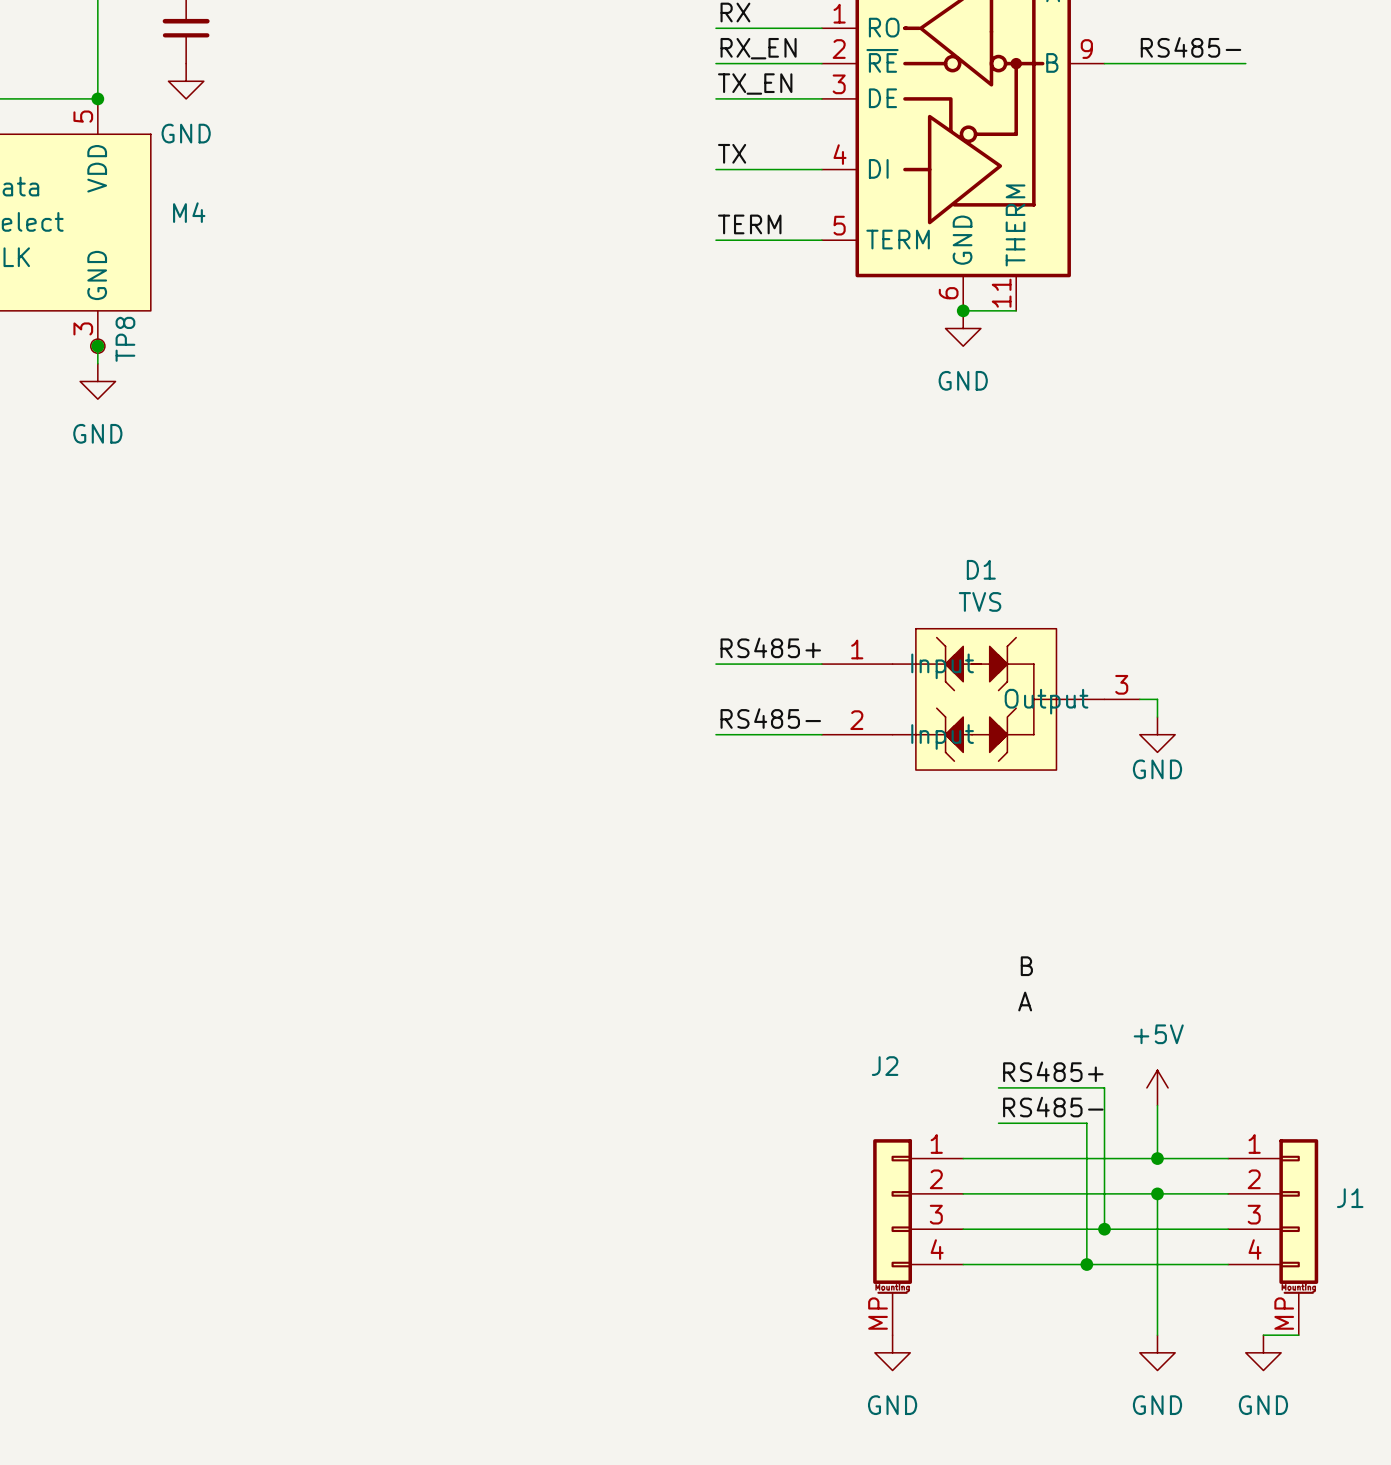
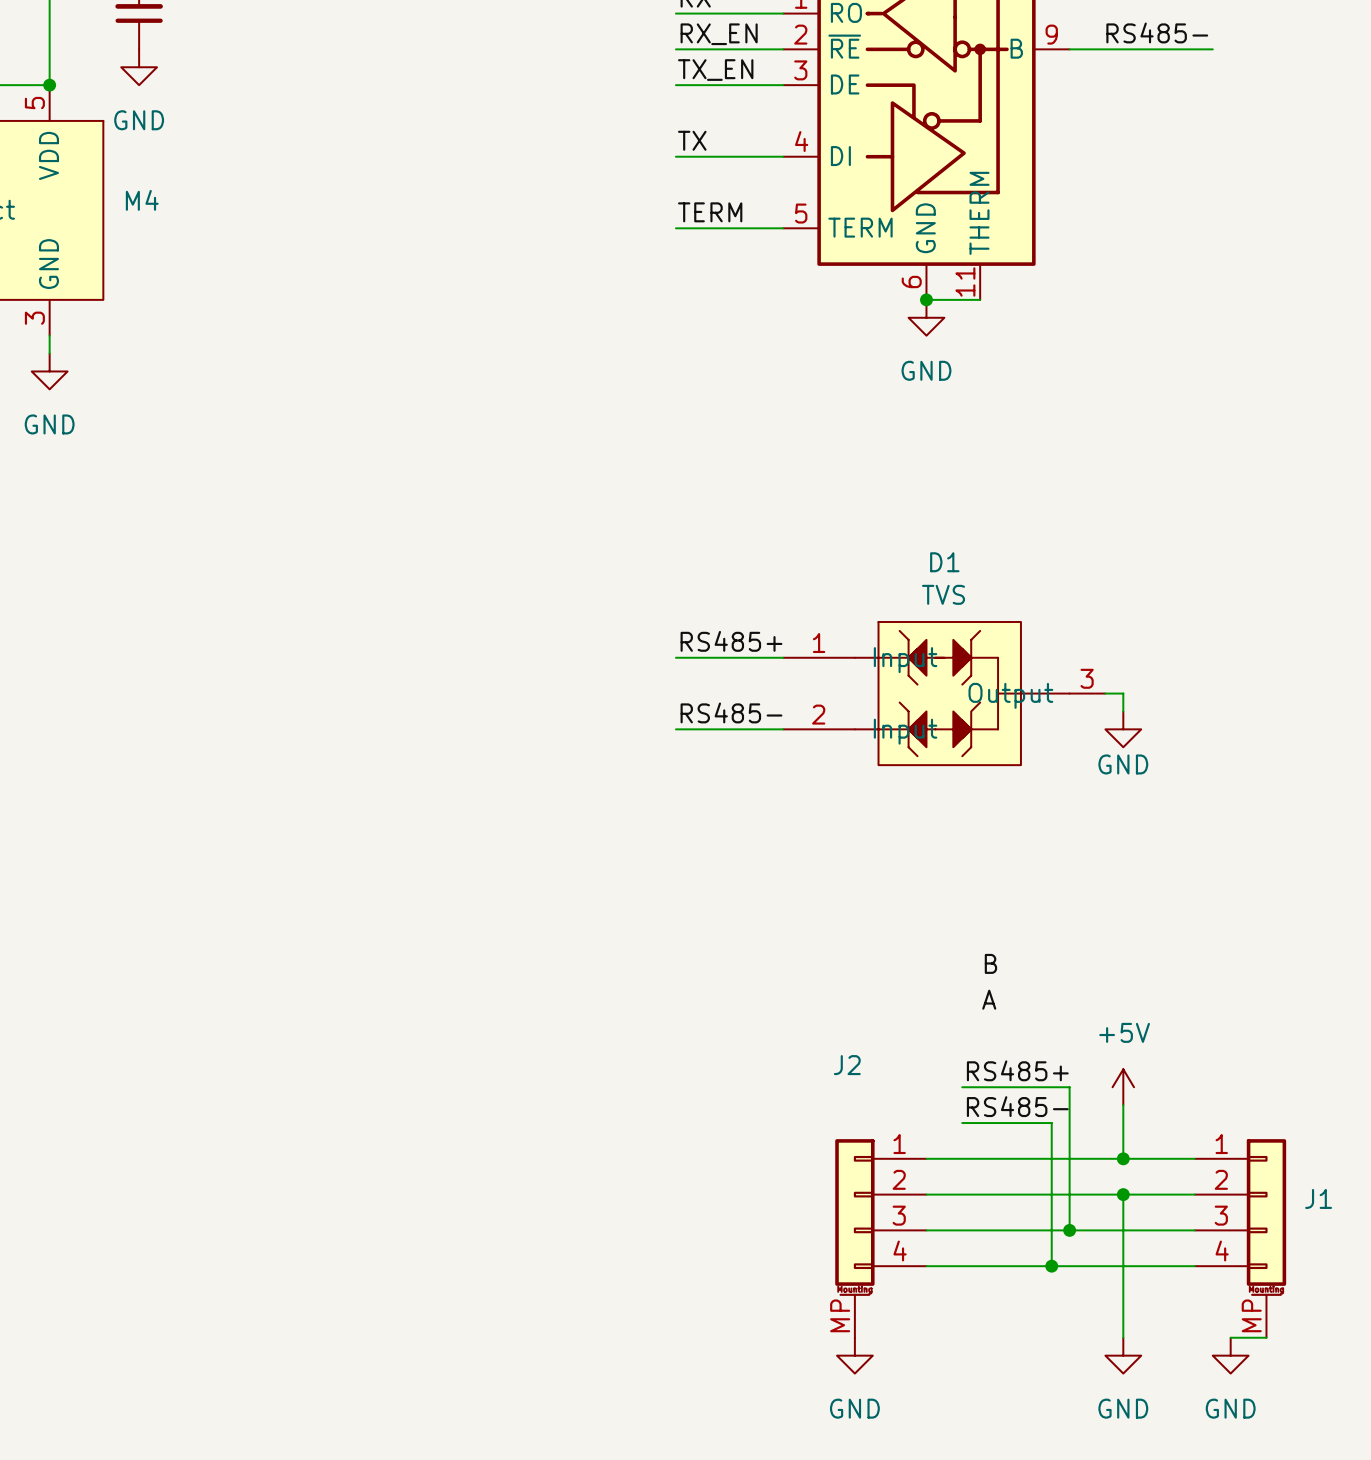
junction: (97, 346) -> none
TP8: (97, 346) -> none

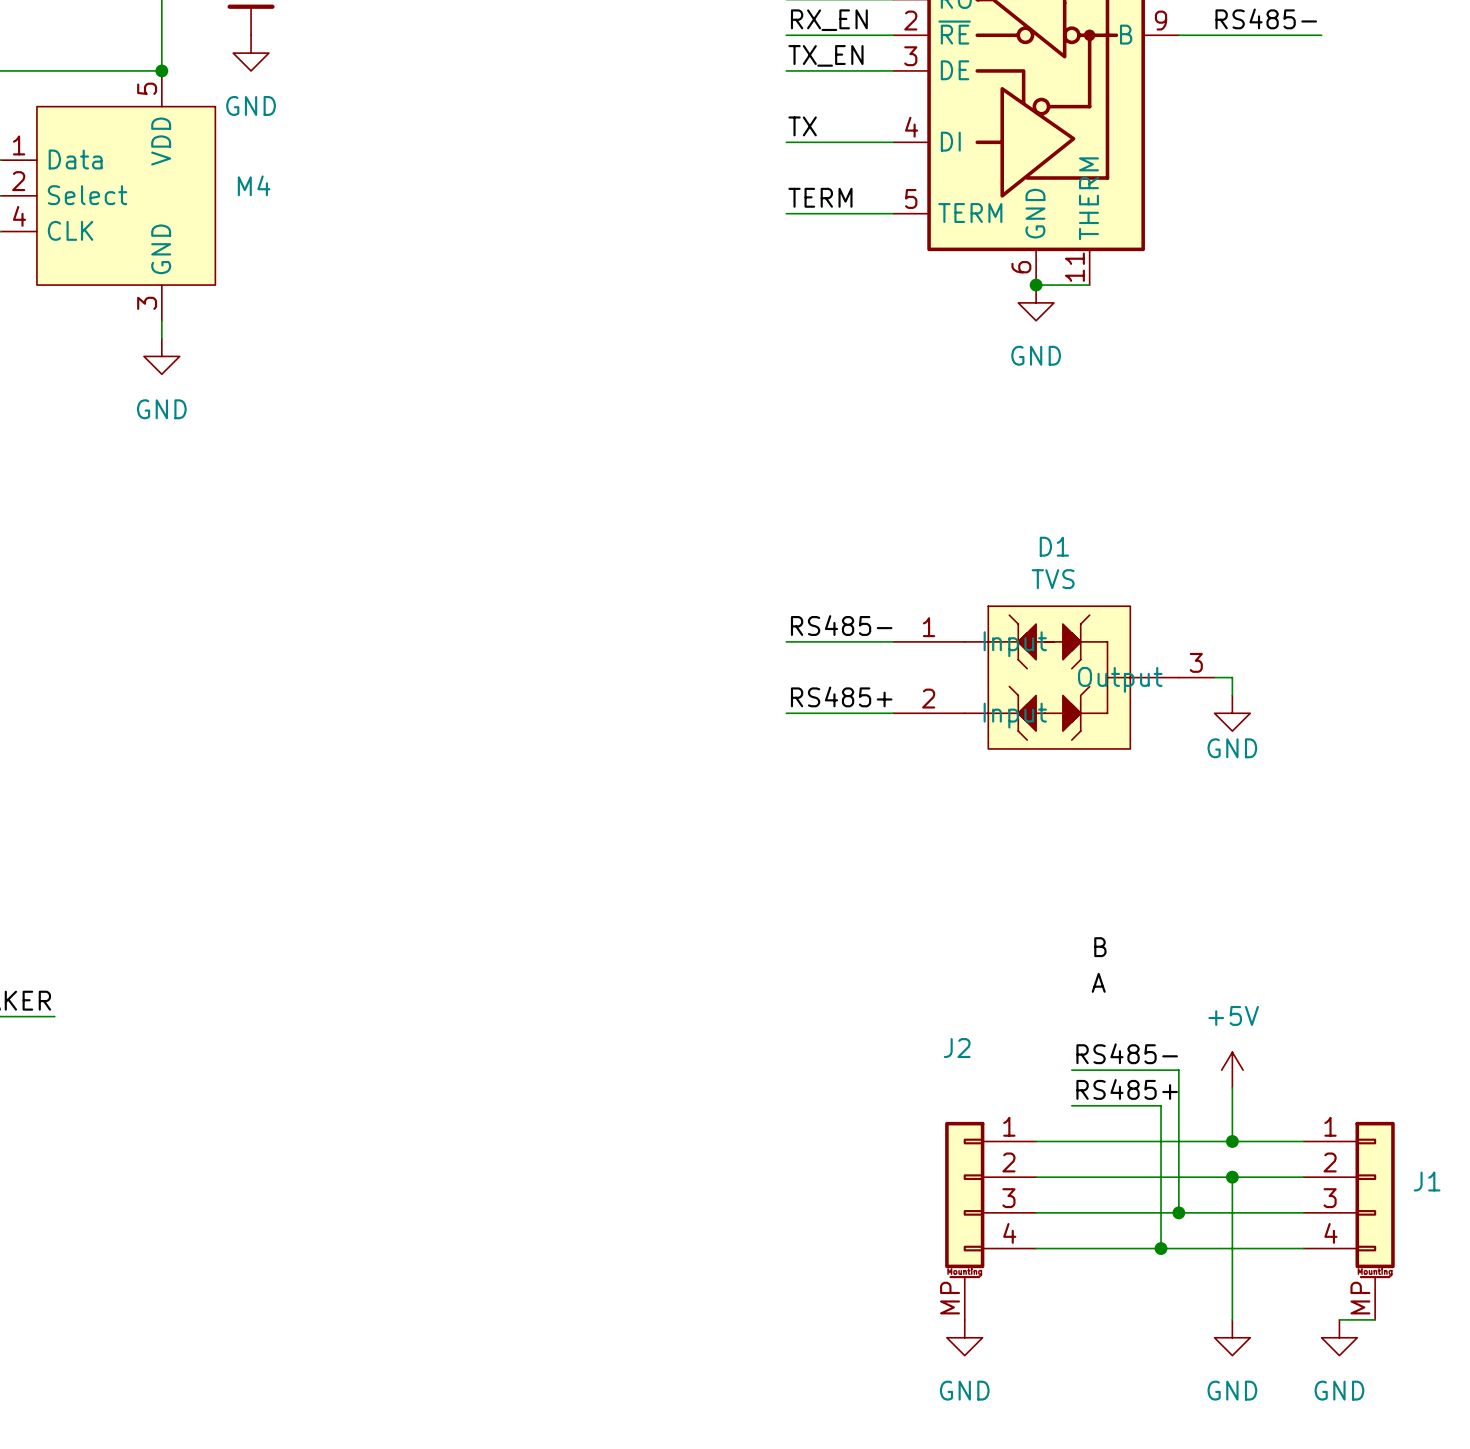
label: RS485+ (731, 641) -> RS485- (841, 625)
label: RS485- (731, 712) -> RS485+ (841, 696)
label: RS485+ (1017, 1070) -> RS485- (1127, 1053)
label: RS485- (1017, 1106) -> RS485+ (1127, 1089)

